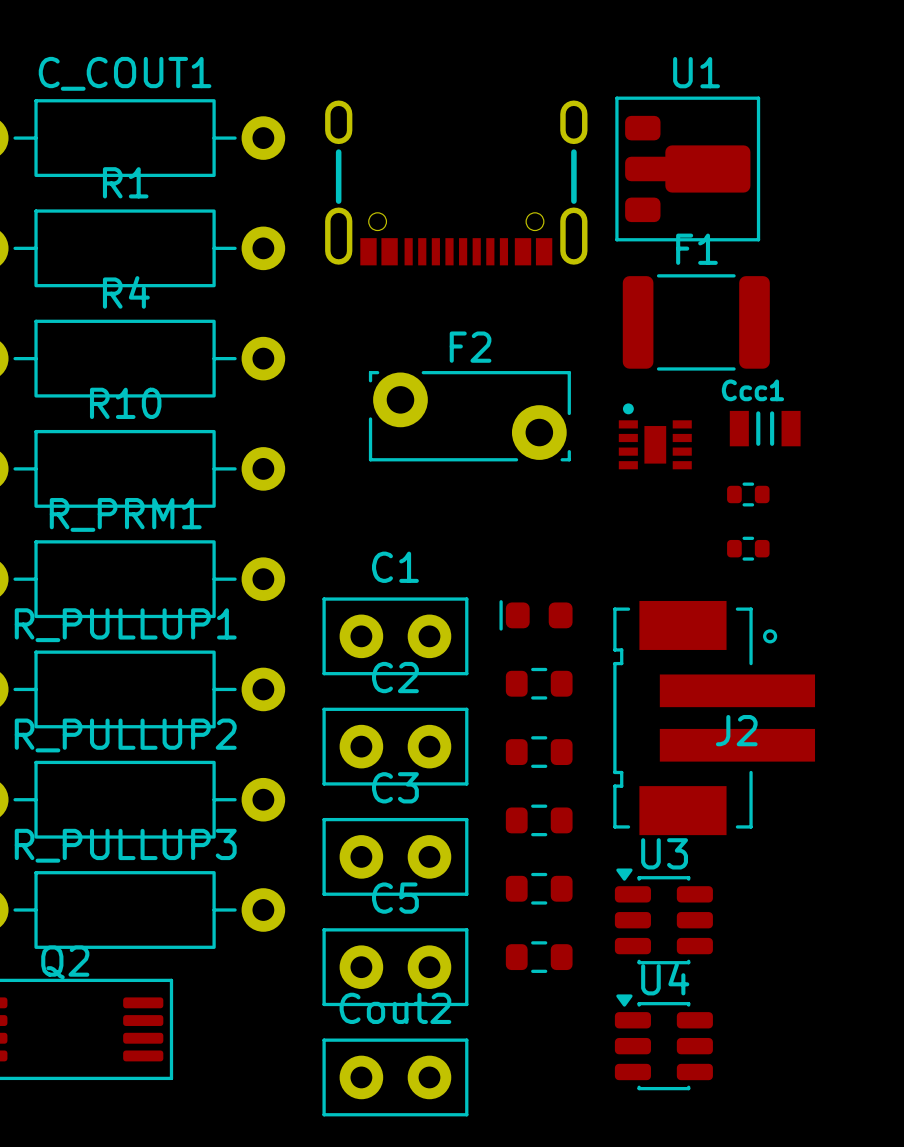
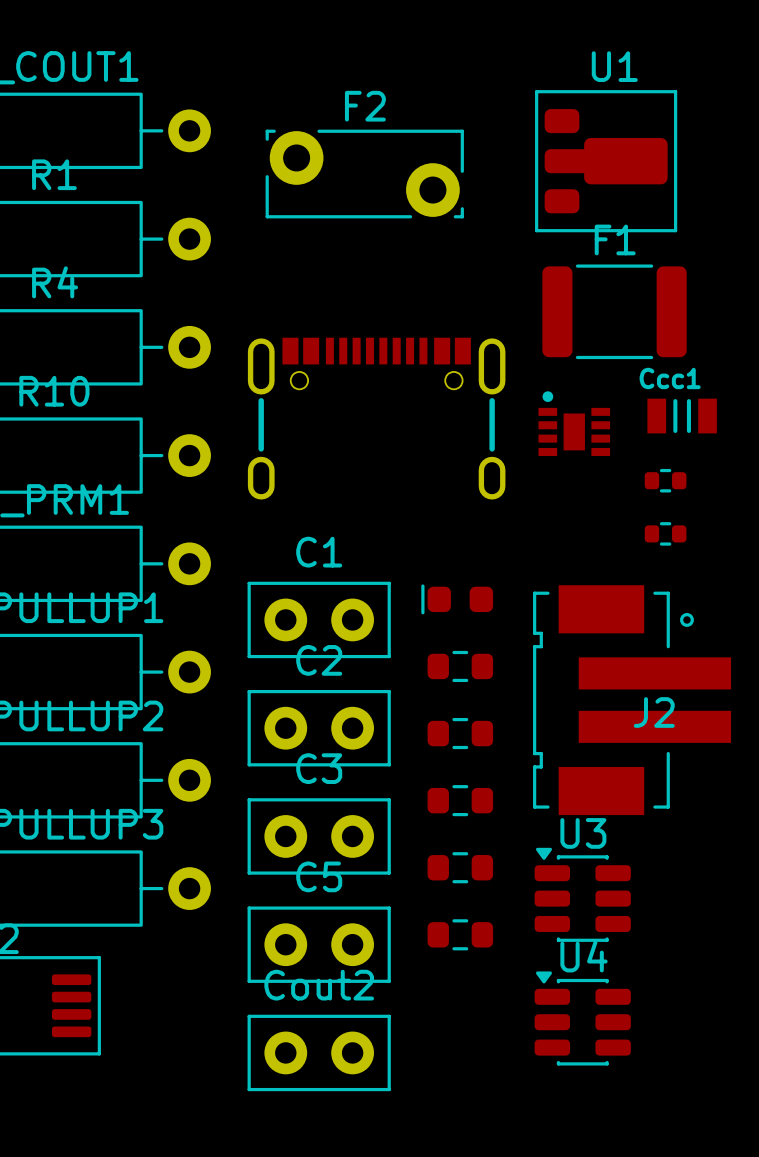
part rotation: 0° (456, 182) -> 180° (376, 418)
part position: (456, 182) -> (376, 418)
F2 position: (469, 416) -> (364, 174)

